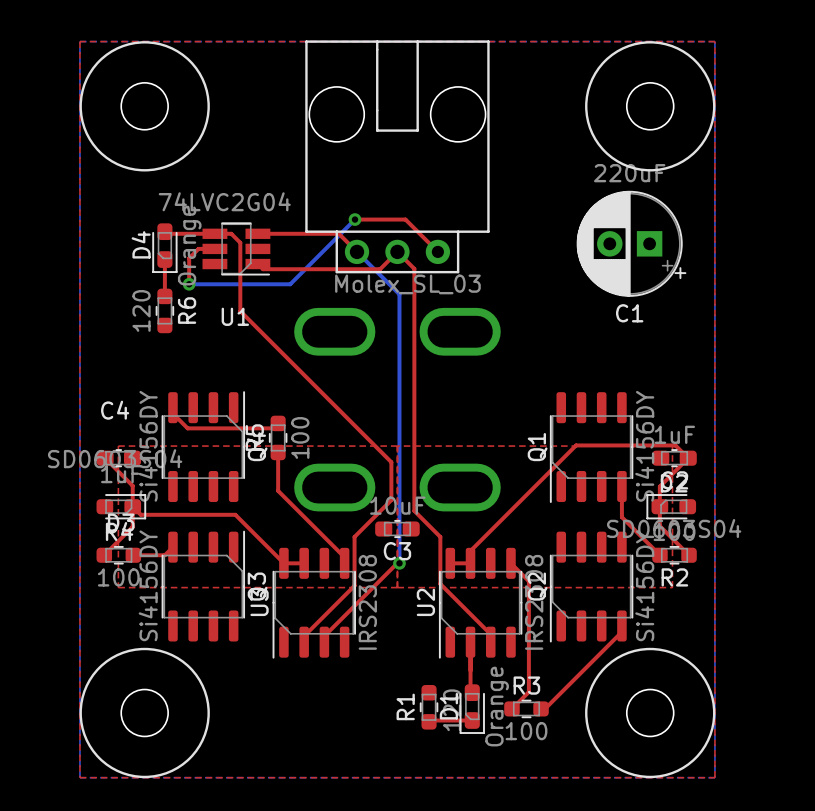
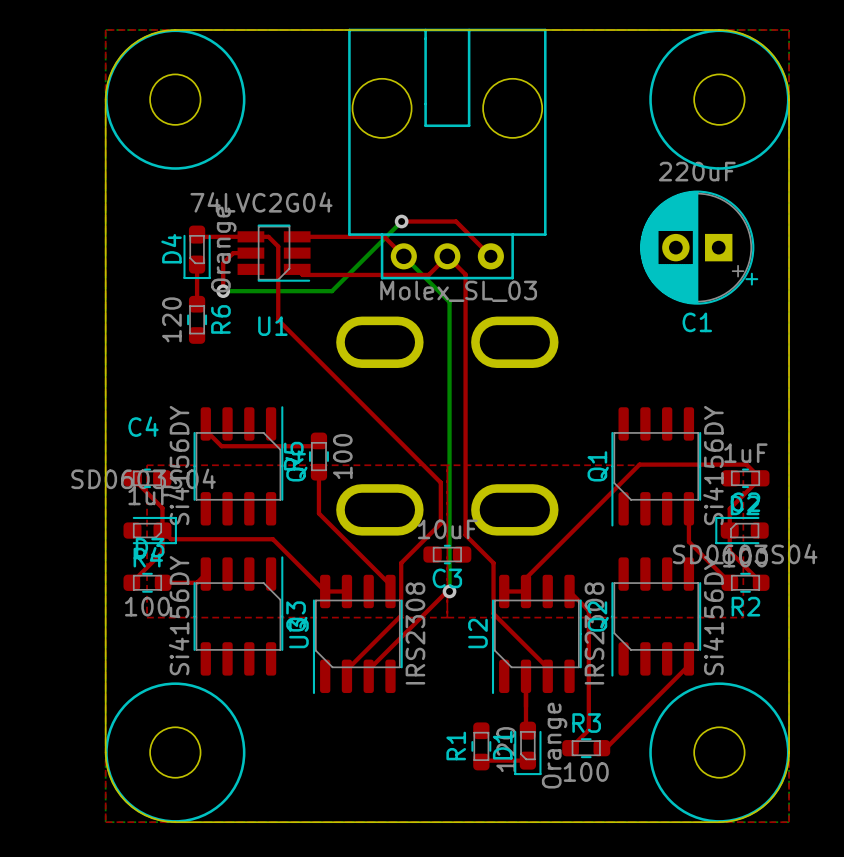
board edge: none -> (175, 30) (719, 30) (734, 31) (749, 36) (762, 45) (773, 56) (785, 76) (789, 99) (789, 752) (787, 768) (782, 782) (773, 795) (762, 806) (742, 818) (719, 822) (175, 822) (159, 820) (145, 815) (131, 806) (120, 795) (109, 775) (105, 752) (106, 91) (109, 76) (116, 62) (131, 45) (152, 33) (175, 30)

